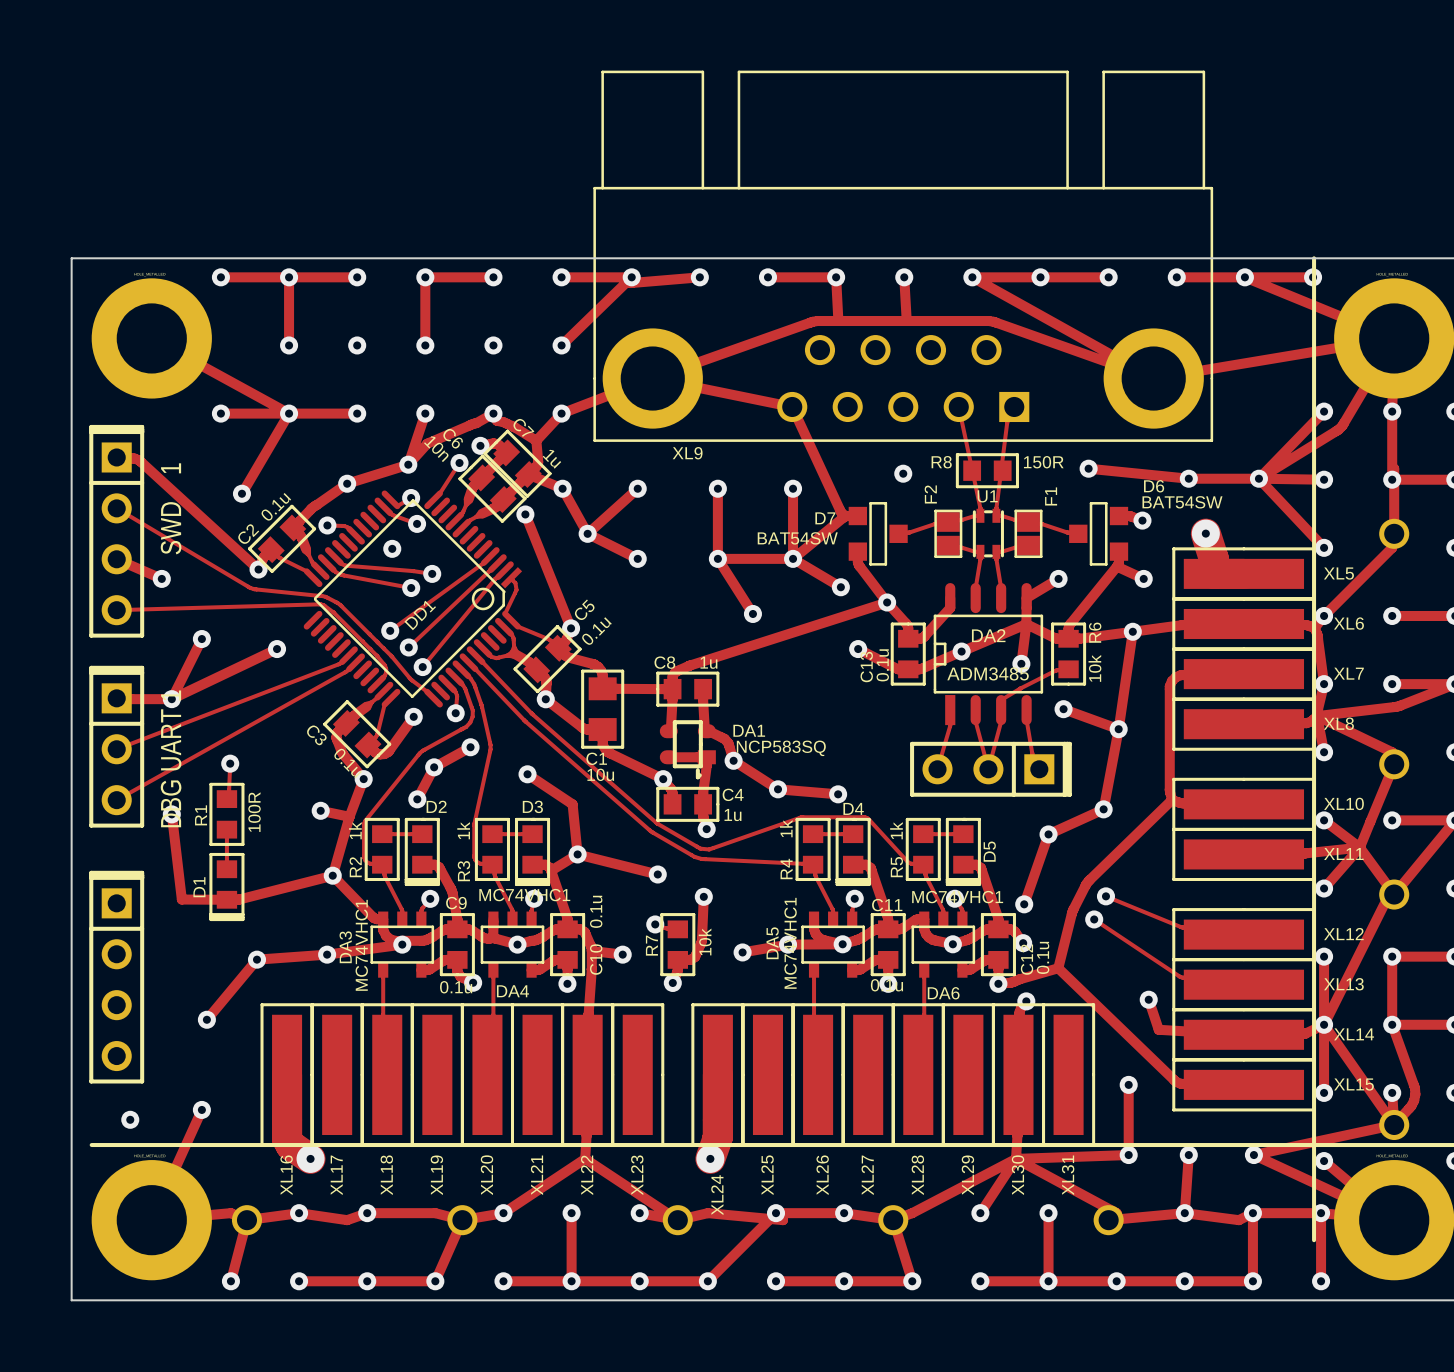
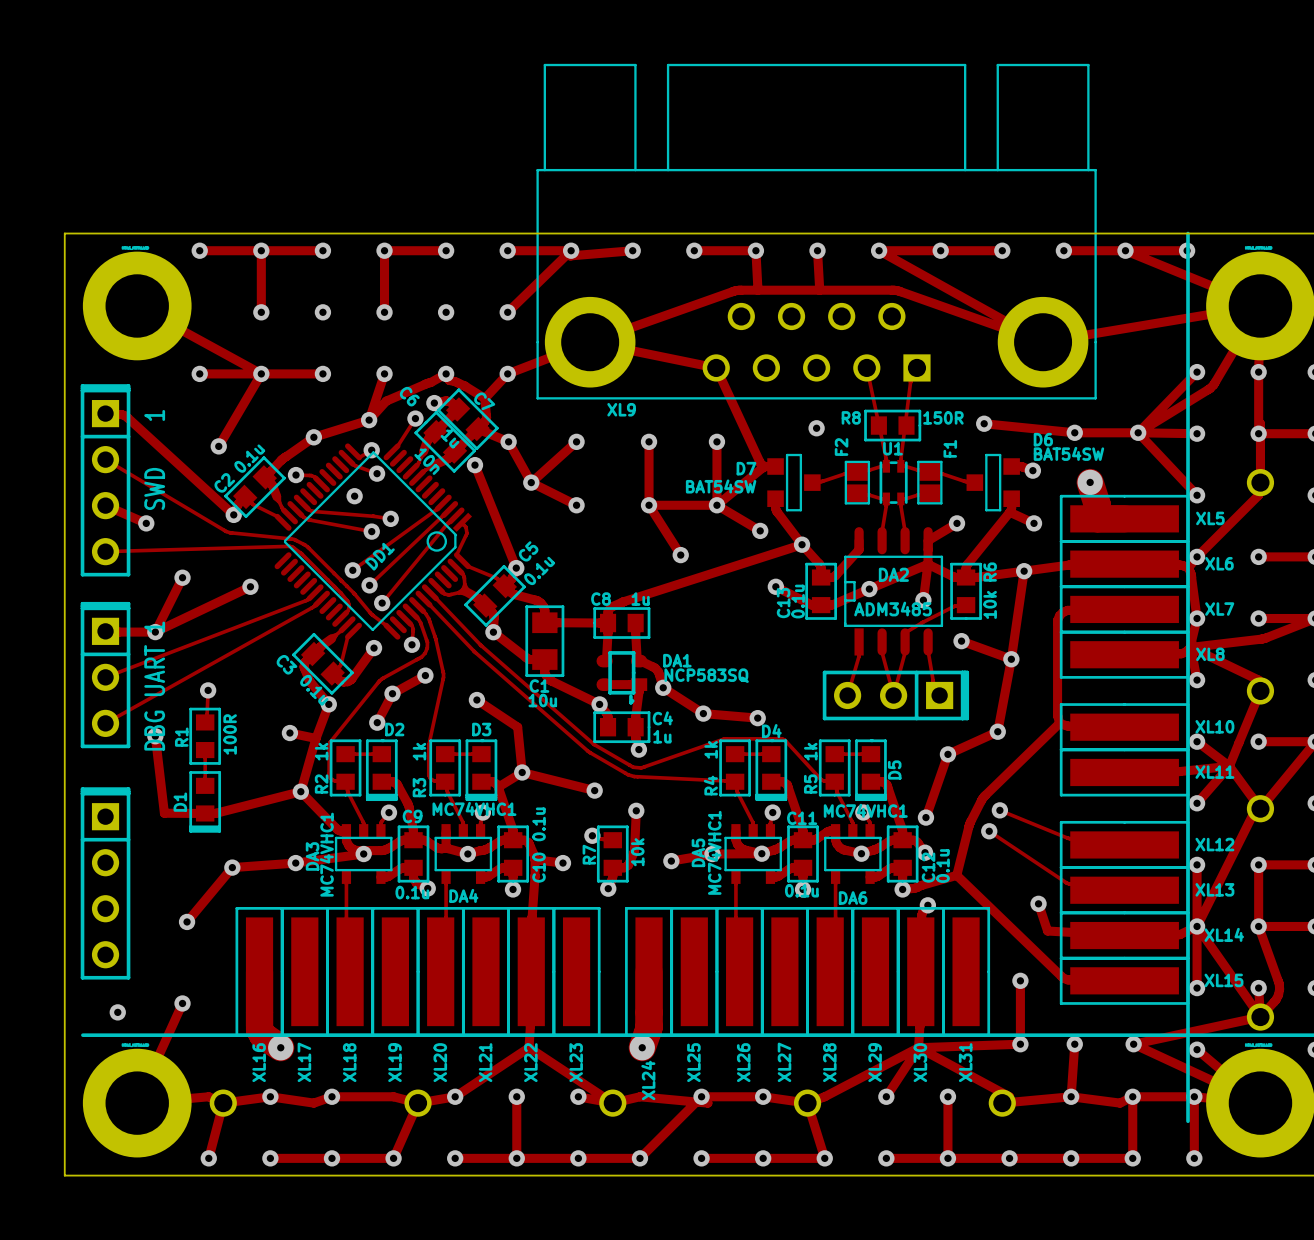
C7 name position: C7 (523, 427) -> C7 (484, 401)
C6 value position: 10n (436, 449) -> 10n (427, 461)
C7 value position: 1u (551, 459) -> 1u (450, 439)

